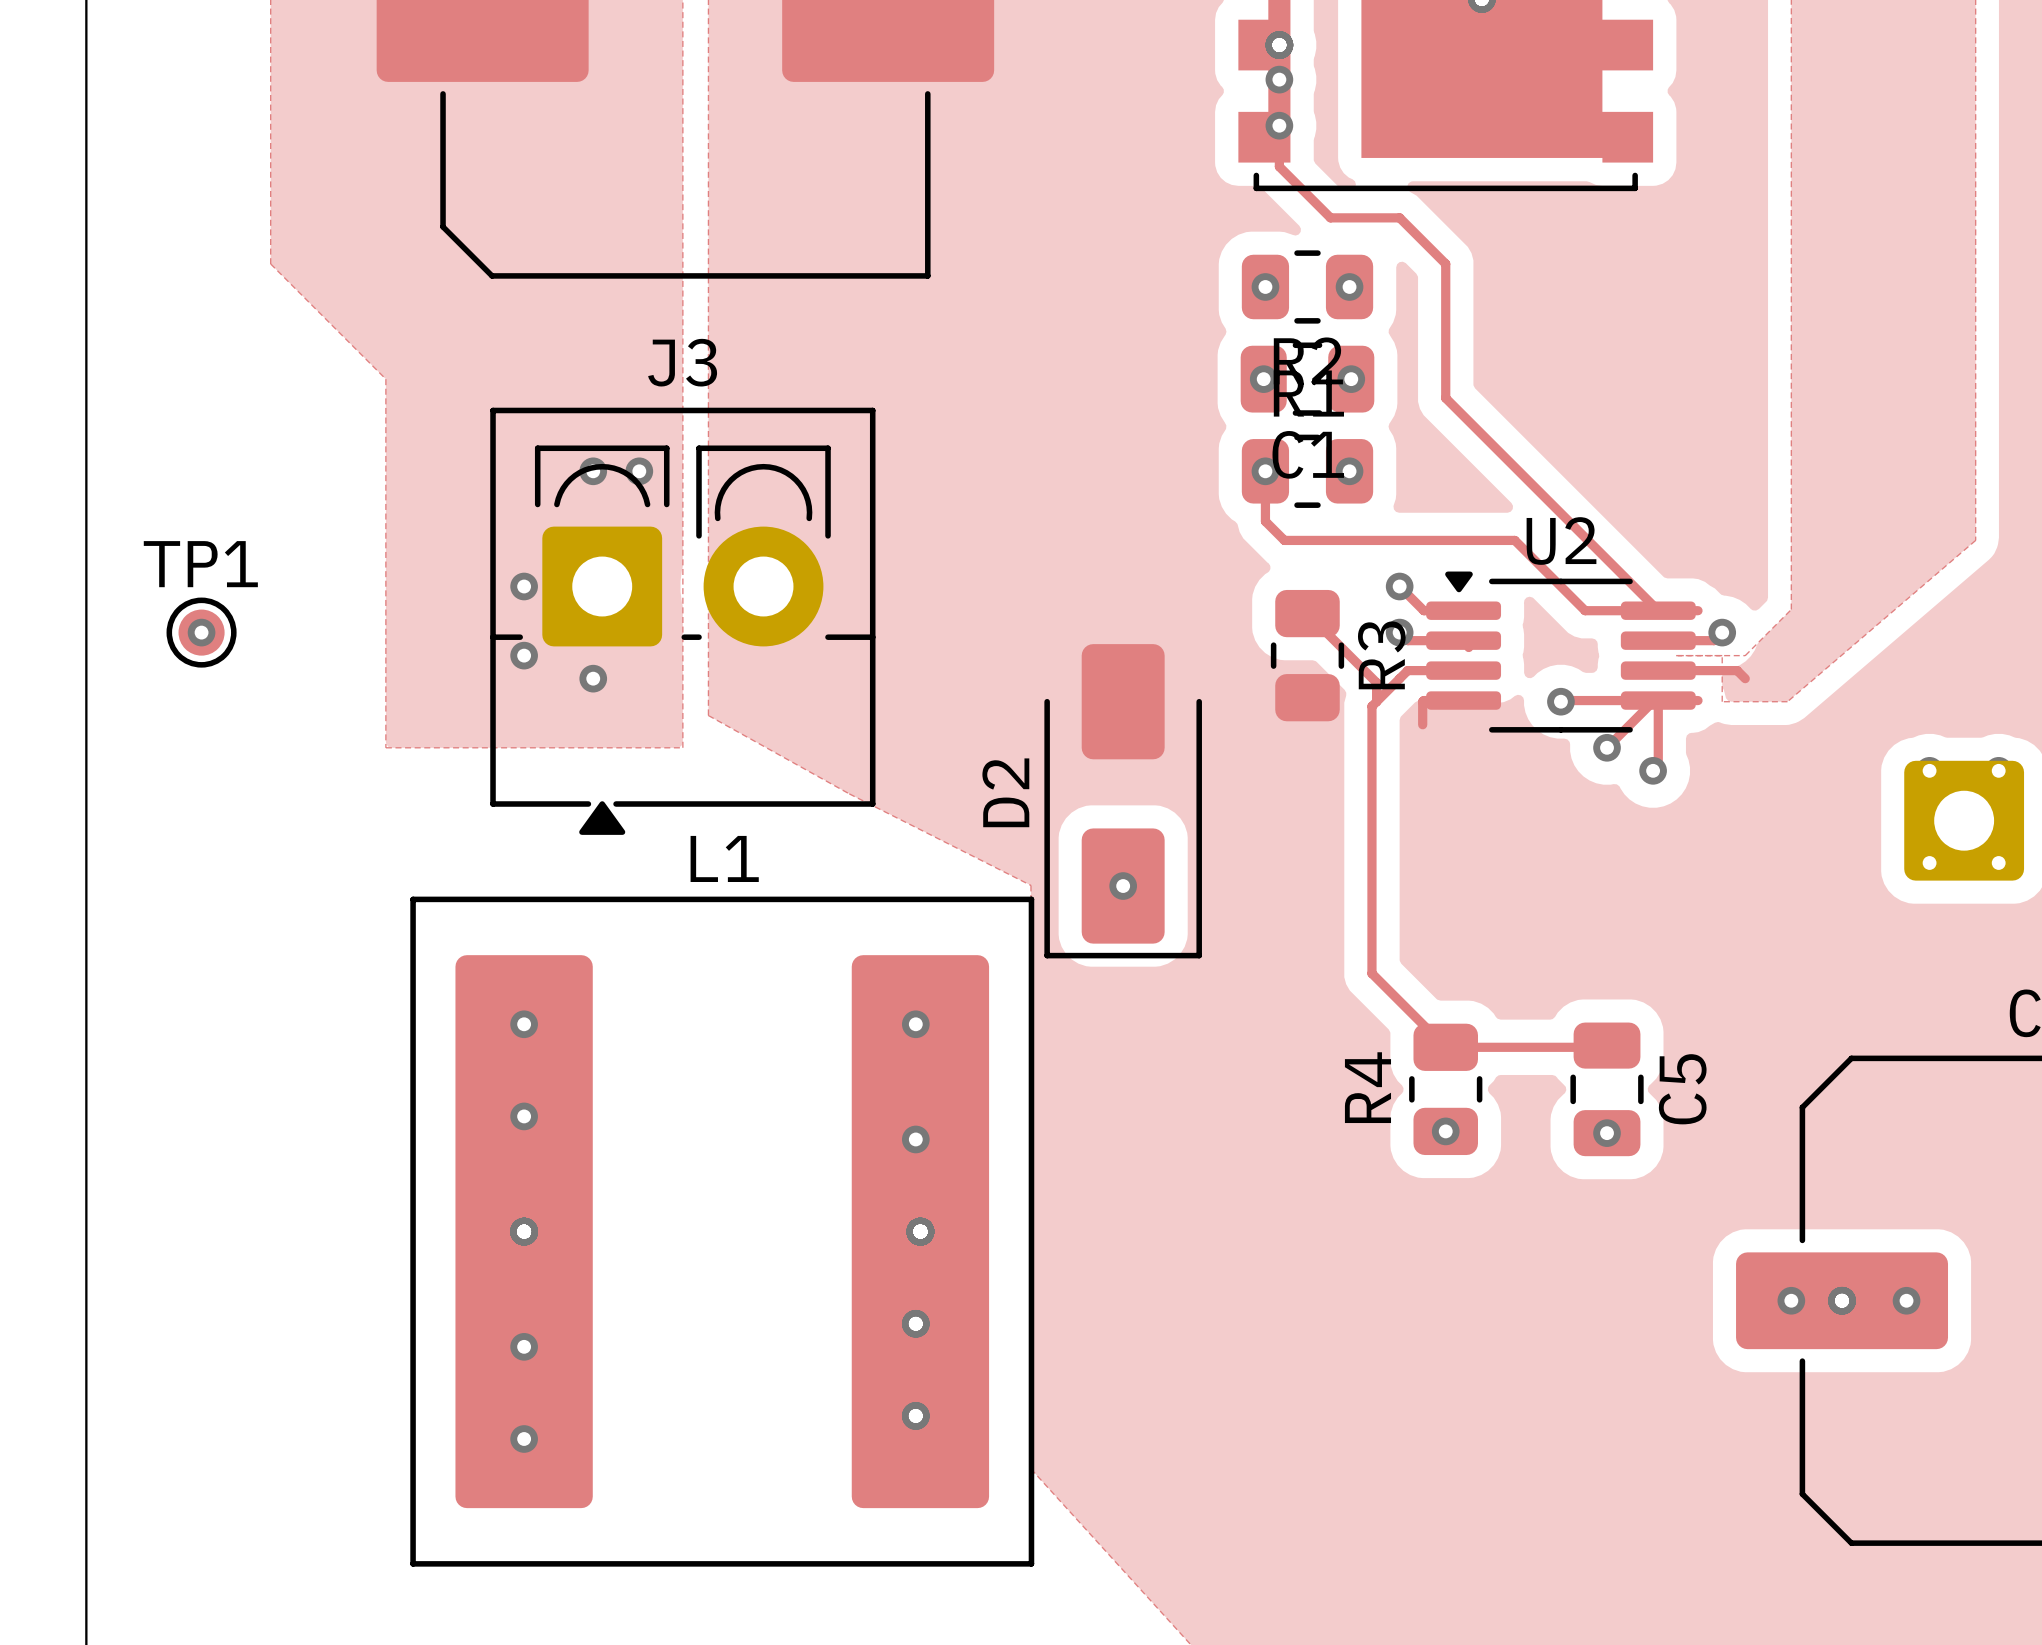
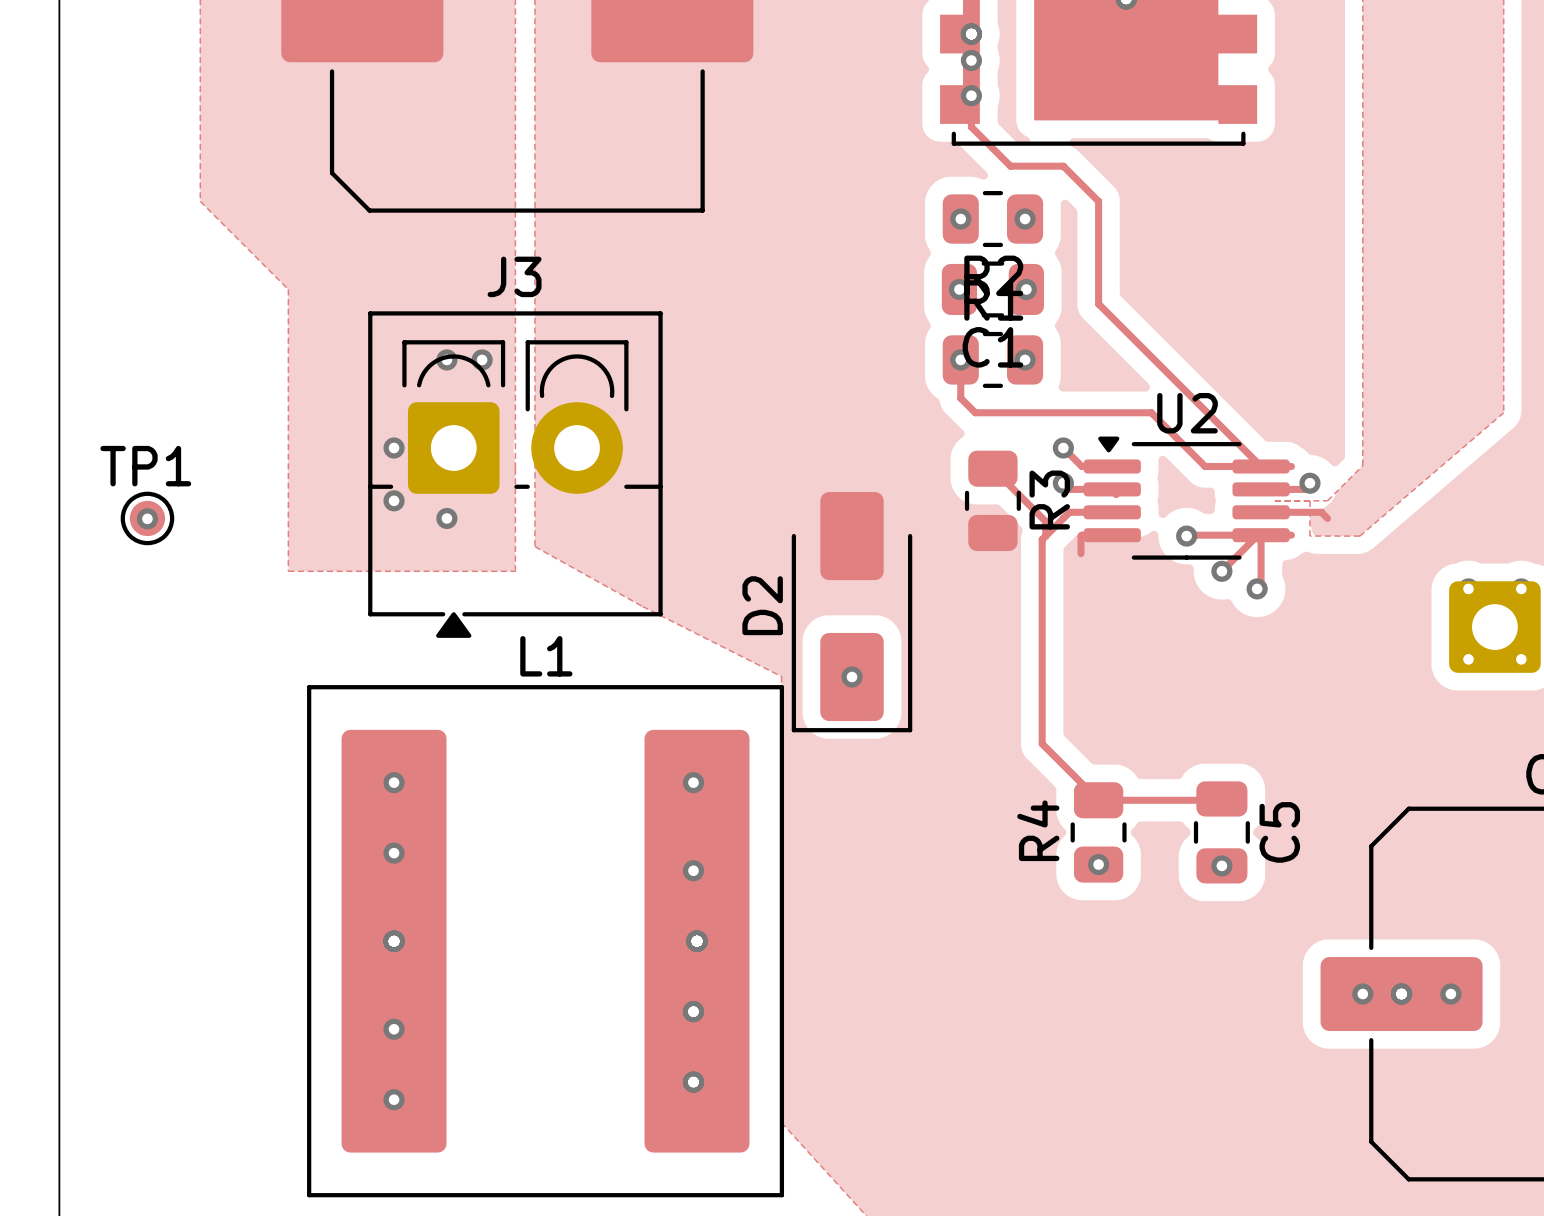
TP1 position: (201, 632) -> (147, 518)
via position: (201, 632) -> (147, 518)

